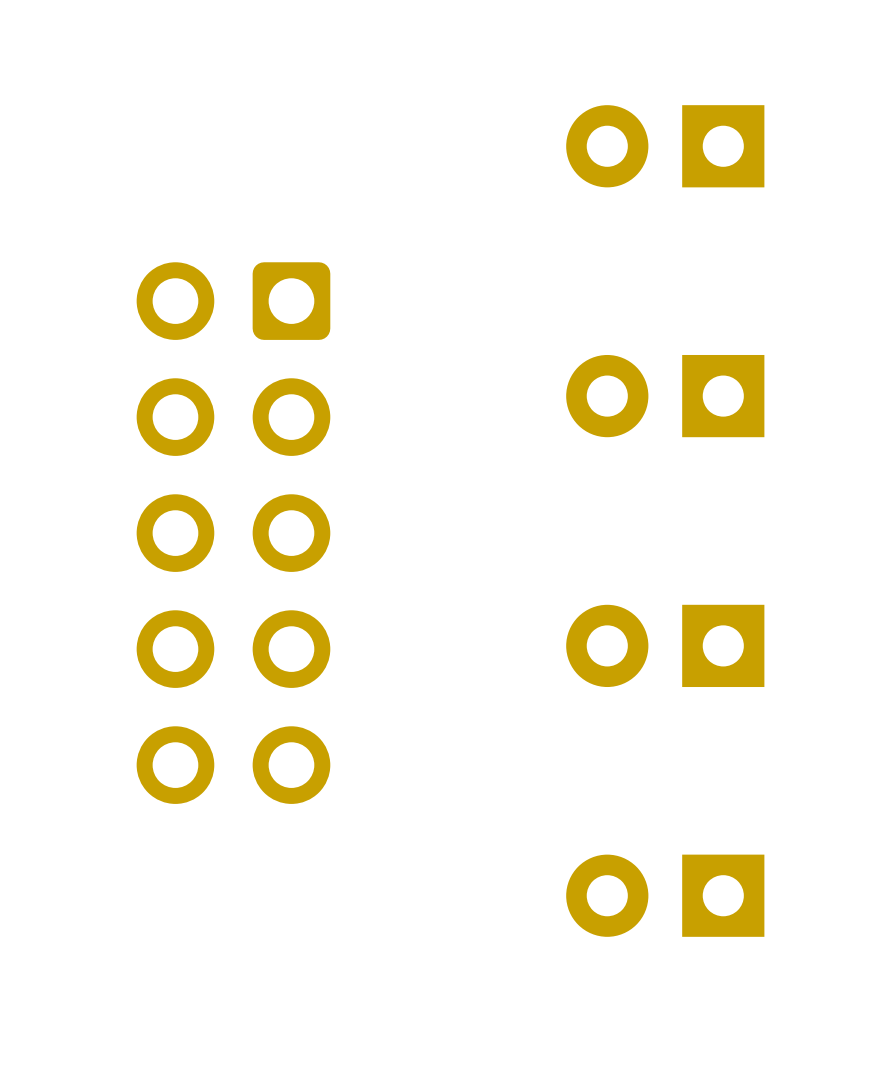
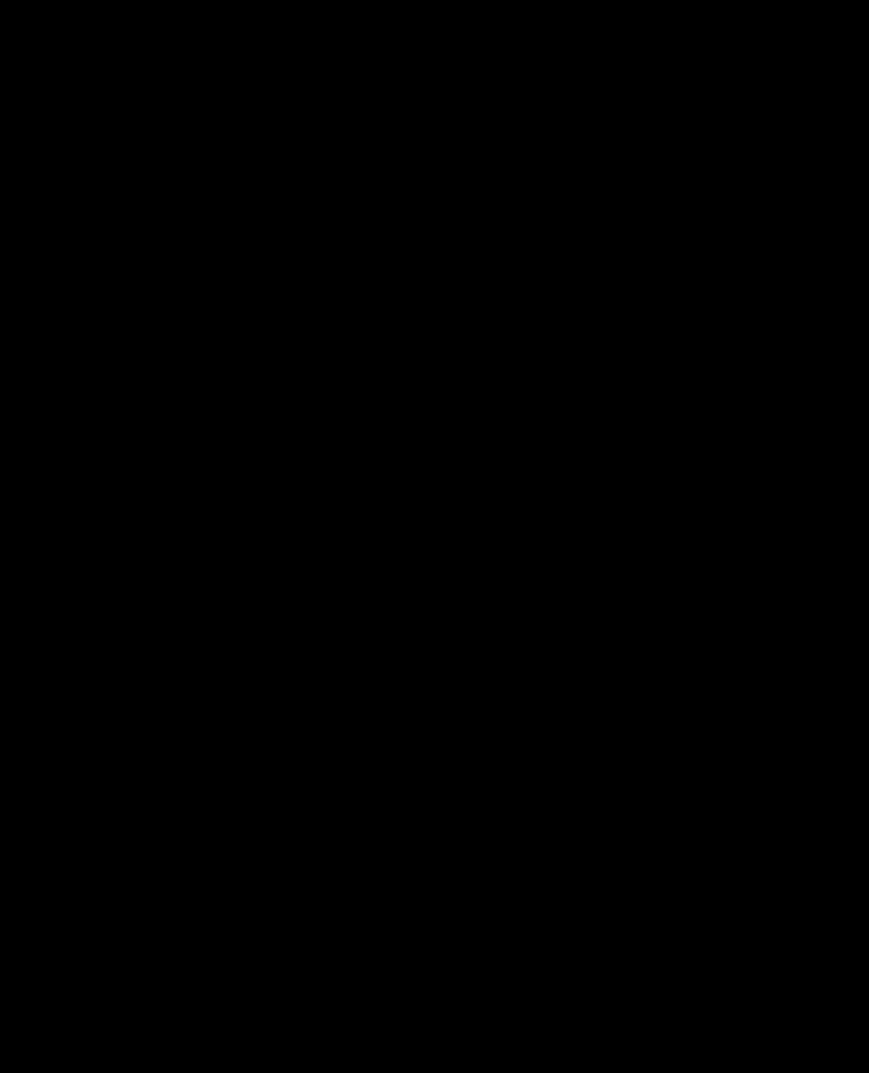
part: (665, 146) -> none
part: (665, 396) -> none
part: (233, 533) -> none
part: (665, 645) -> none
part: (665, 895) -> none

